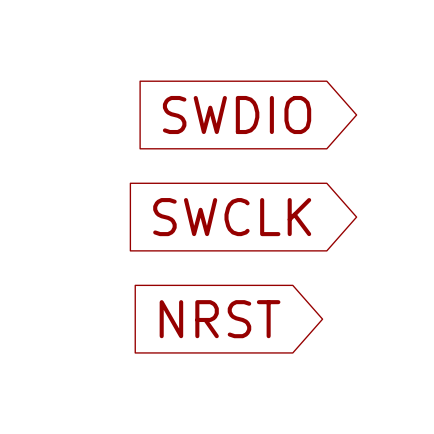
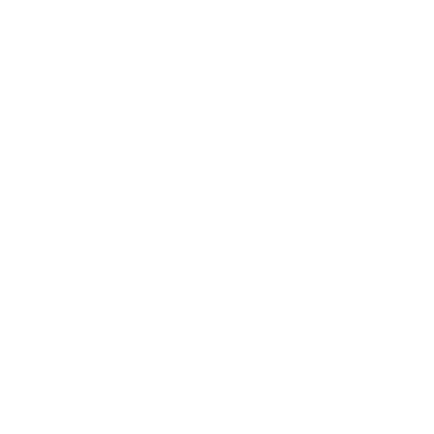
global label: SWDIO (237, 115) -> none
global label: SWCLK (232, 217) -> none
global label: NRST (220, 319) -> none

